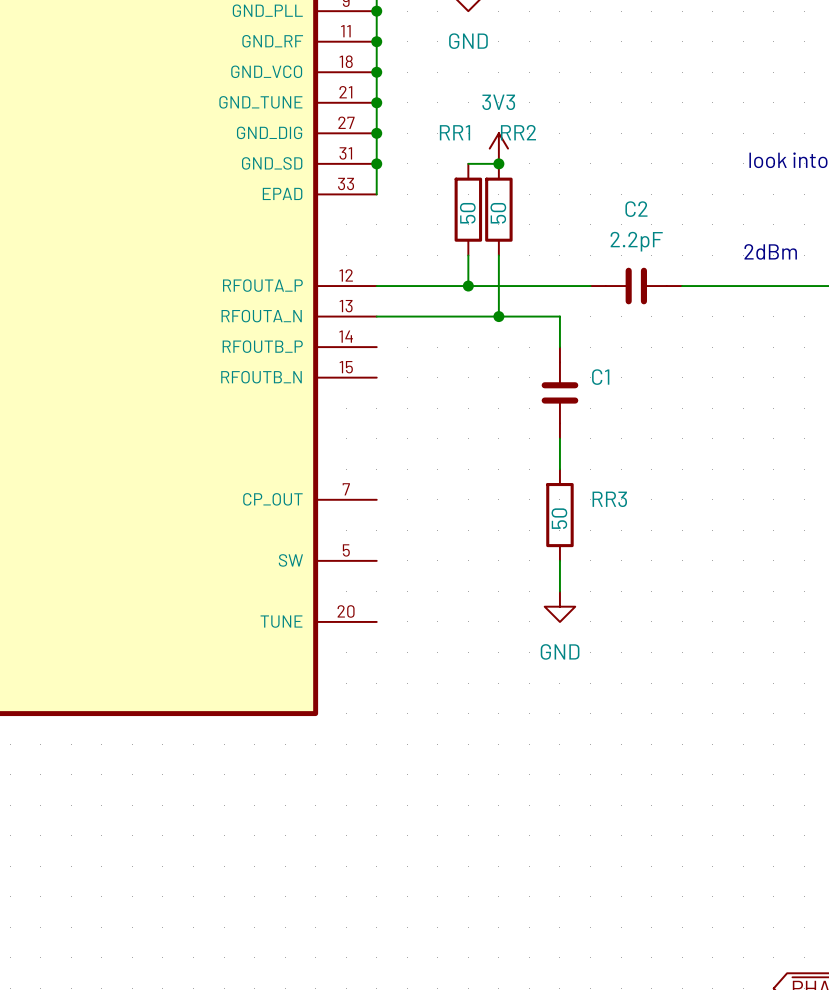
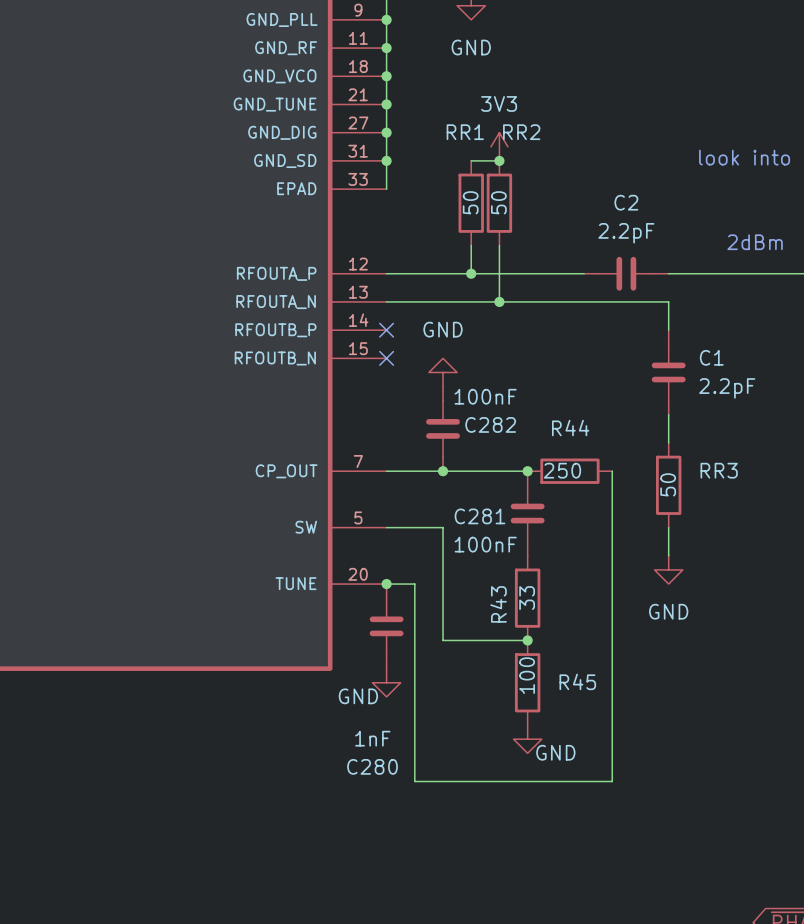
wire: (559, 316) (559, 347) -> (555, 301) (668, 301) (668, 330)
no-connect mark: none -> (386, 330)
no-connect mark: none -> (386, 358)
power symbol: none -> GND (443, 372)
C1 position: (559, 392) -> (668, 372)
C1 value: none -> 2.2pF (727, 388)
wire: (559, 438) (559, 469) -> (668, 414) (668, 443)
C282: none -> 100nF (443, 428)
wire: none -> (386, 471) (527, 471)
junction: none -> (443, 471)
junction: none -> (527, 471)
R44: none -> 250 (569, 471)
wire: none -> (612, 471) (612, 781) (414, 781) (414, 584) (386, 584)
RR3 position: (559, 515) -> (668, 485)
C281: none -> 100nF (527, 513)
wire: none -> (386, 527) (443, 527) (443, 640) (527, 640)
wire: (559, 560) (559, 591) -> (668, 527) (668, 555)
power symbol: GND (559, 606) -> none
power symbol: none -> GND (668, 569)
junction: none -> (386, 584)
R43: none -> 33 (527, 598)
C280: none -> 1nF (386, 626)
junction: none -> (527, 640)
power symbol: none -> GND (386, 682)
R45: none -> 100 (527, 682)
power symbol: none -> GND (527, 739)

